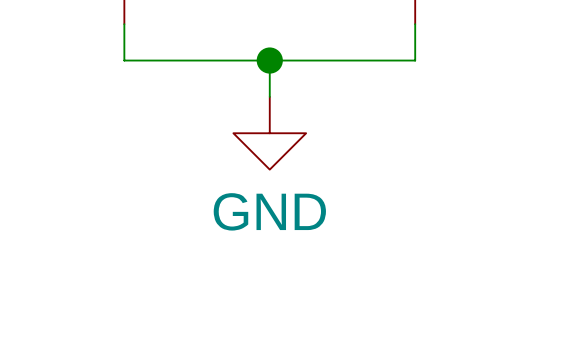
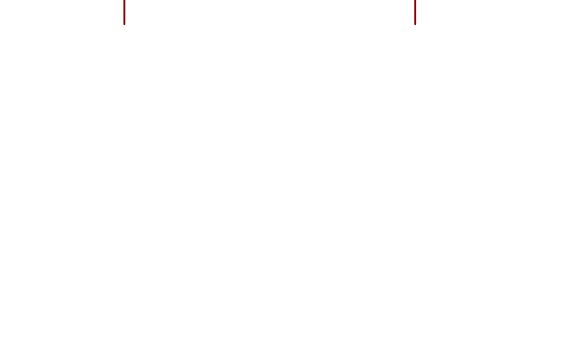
wire: (124, 24) (124, 60) (415, 60) (415, 24) -> none
wire: (269, 60) (269, 96) -> none
junction: (269, 60) -> none
power symbol: GND (269, 133) -> none

